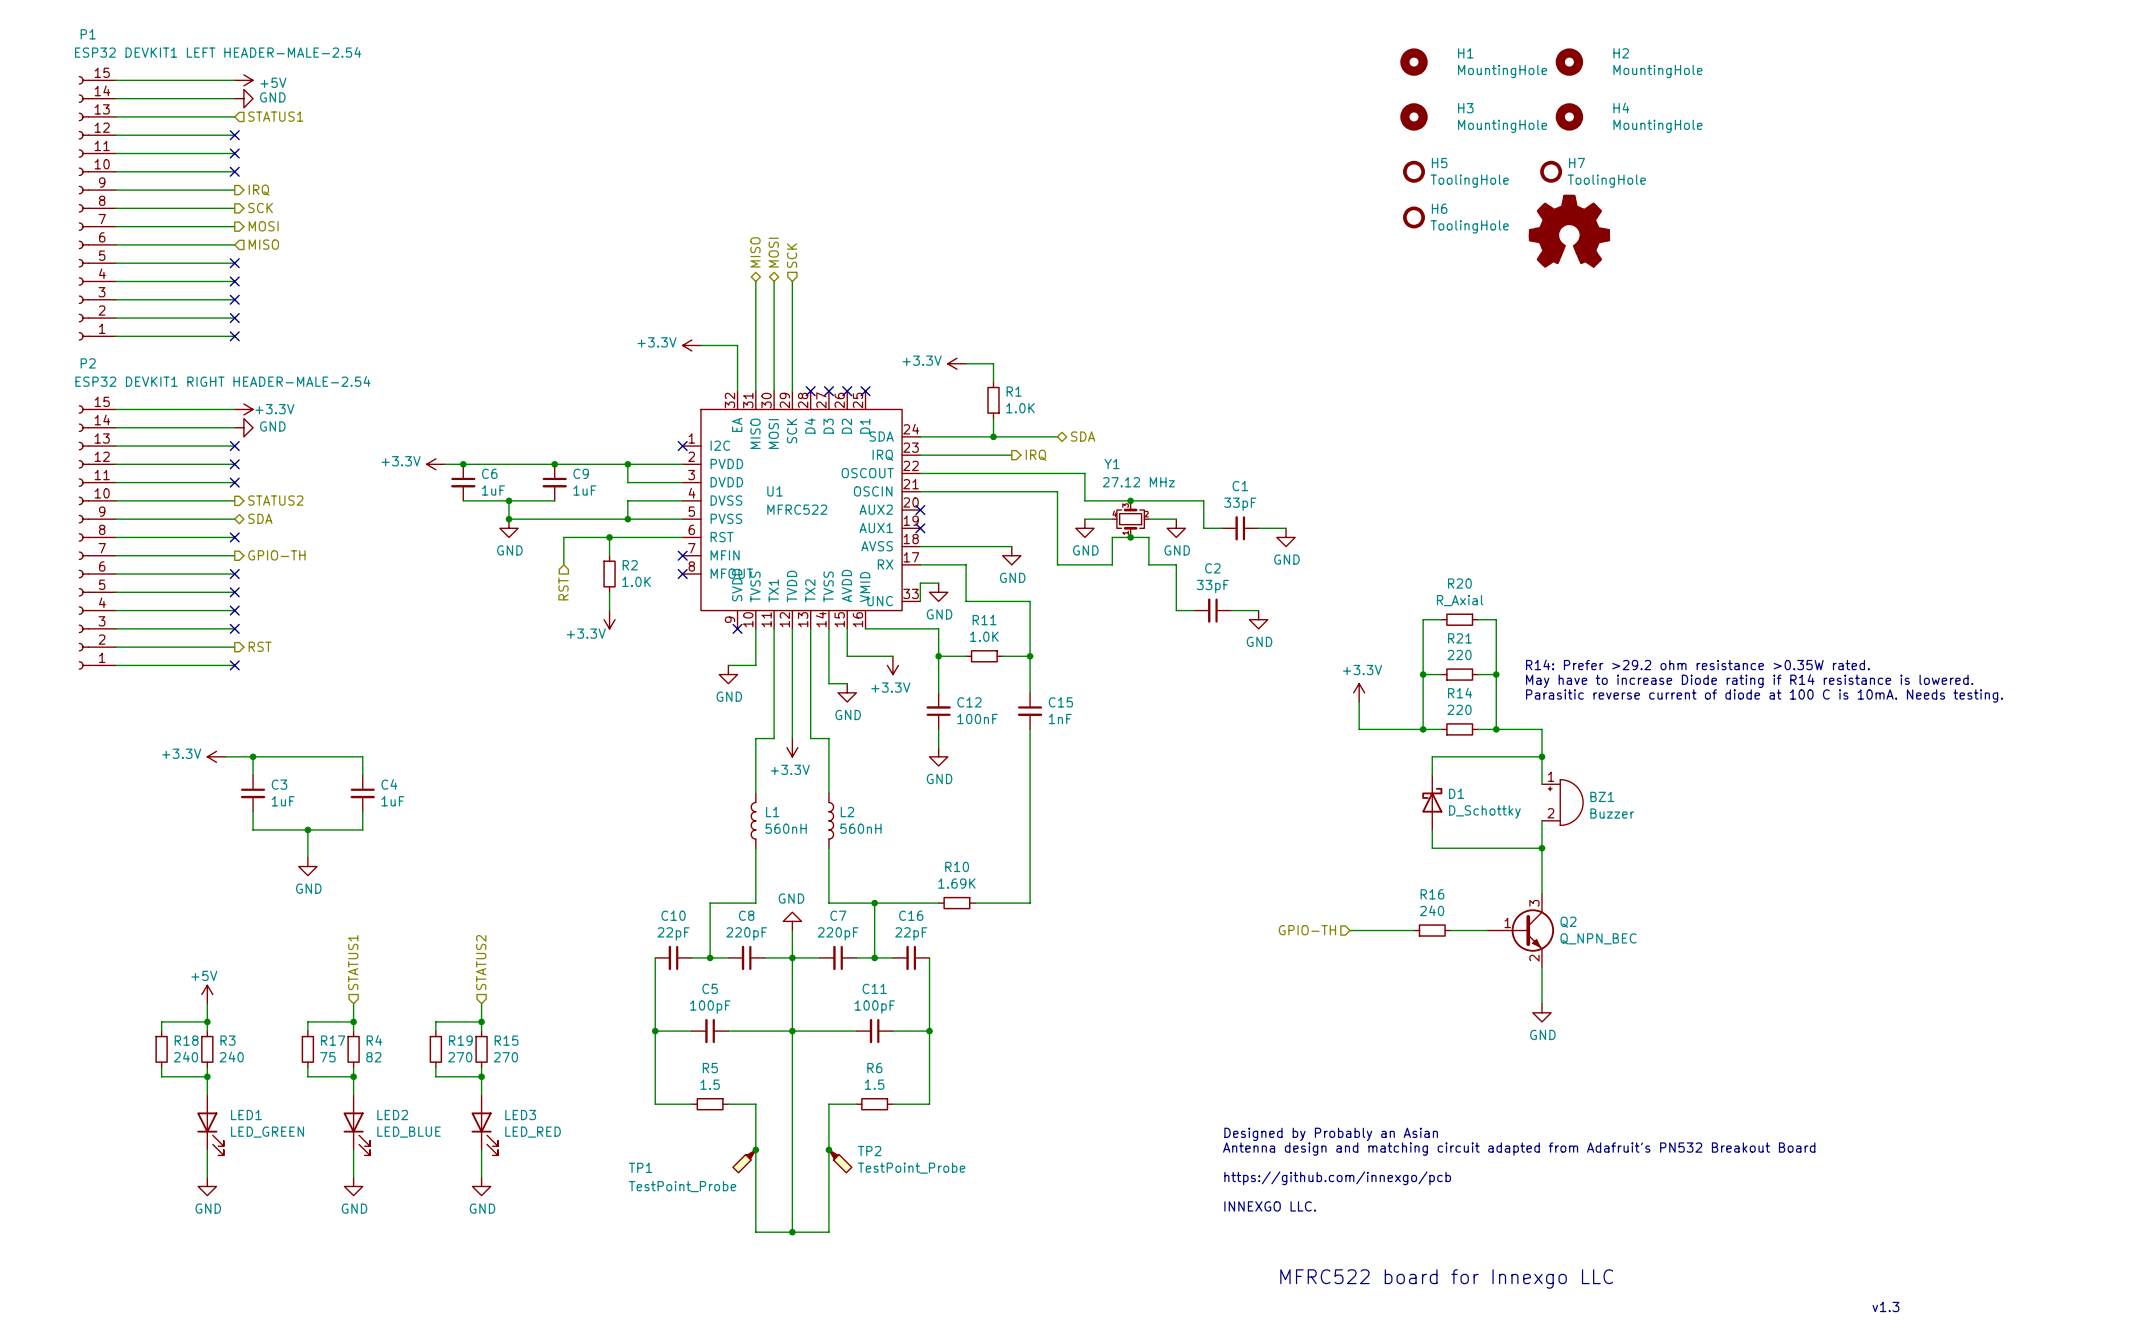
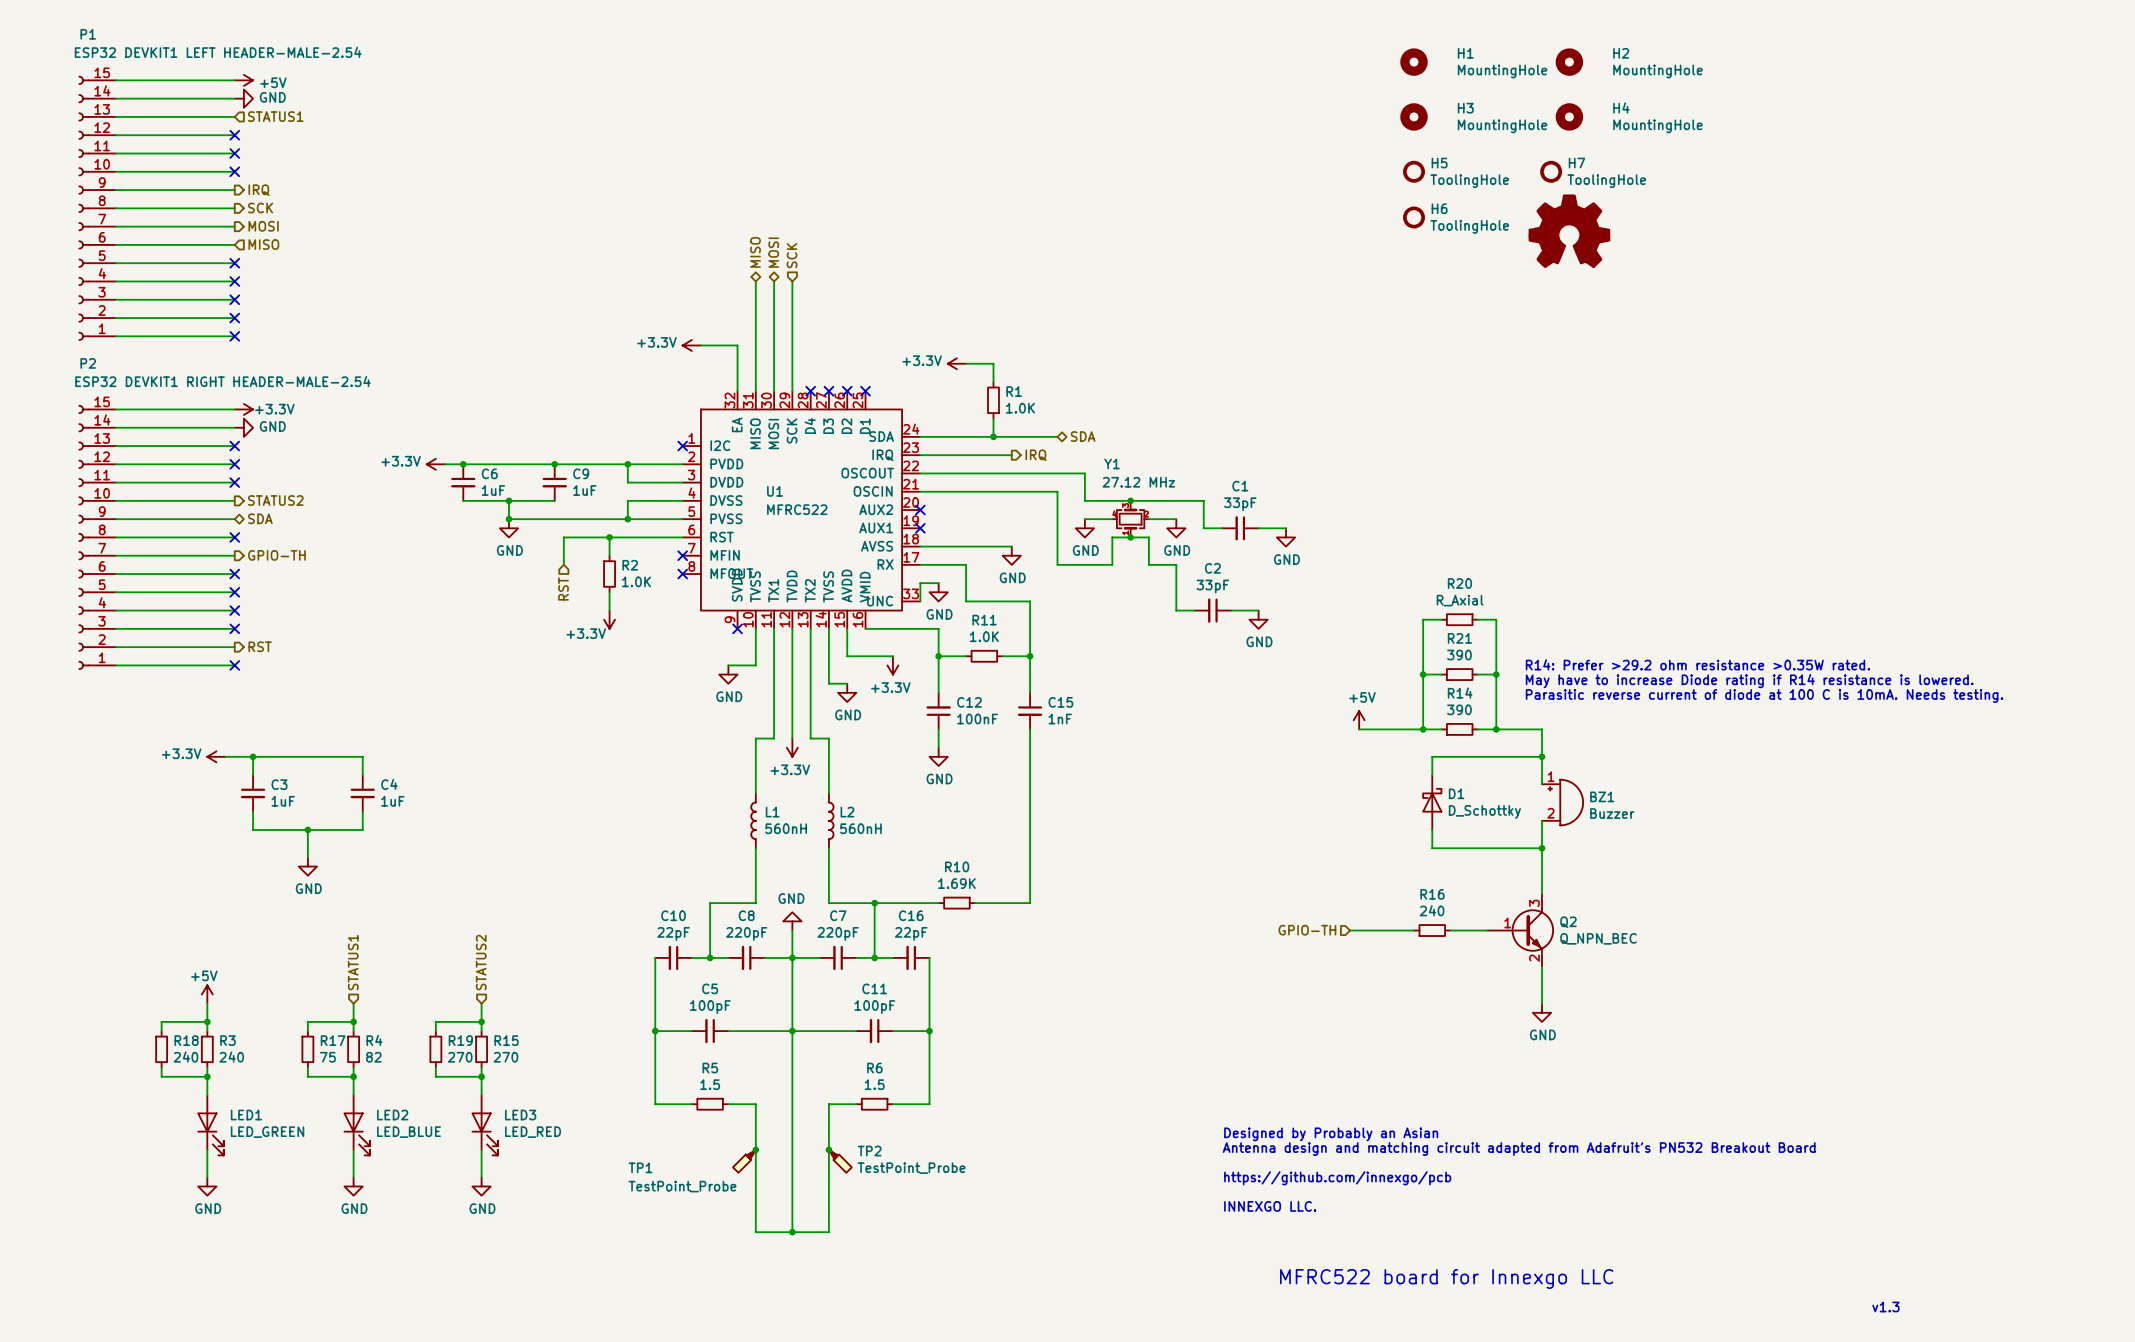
R21 value: 220 (1459, 655) -> 390 (1459, 655)
power symbol: +3.3V (1359, 692) -> none
R14 value: 220 (1459, 709) -> 390 (1459, 709)
power symbol: none -> +5V (1359, 720)

